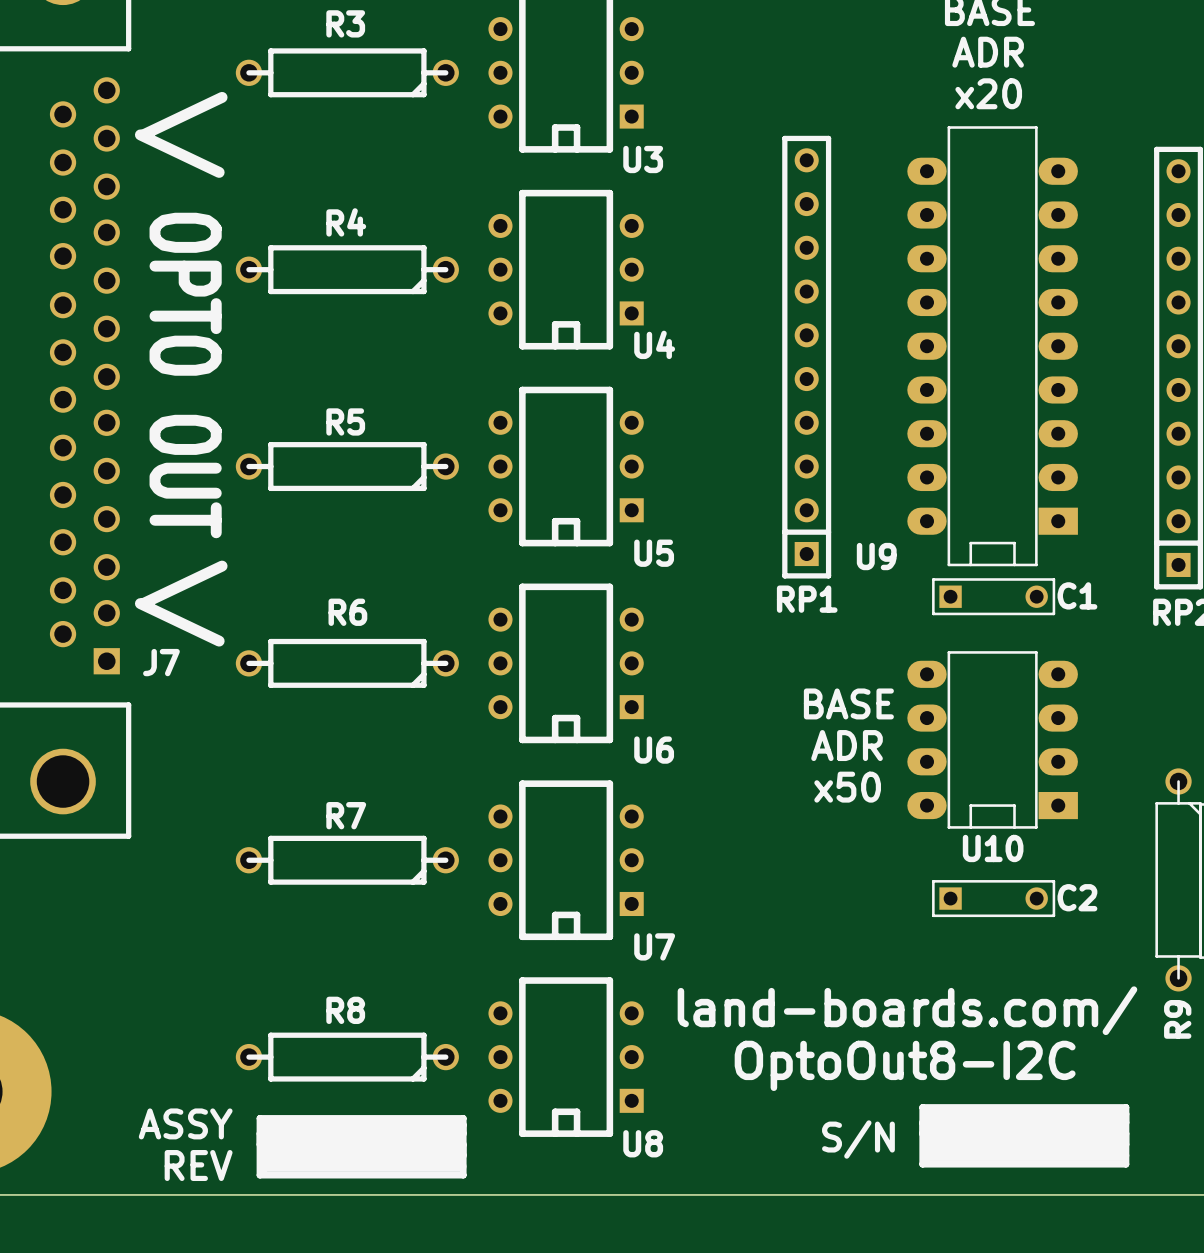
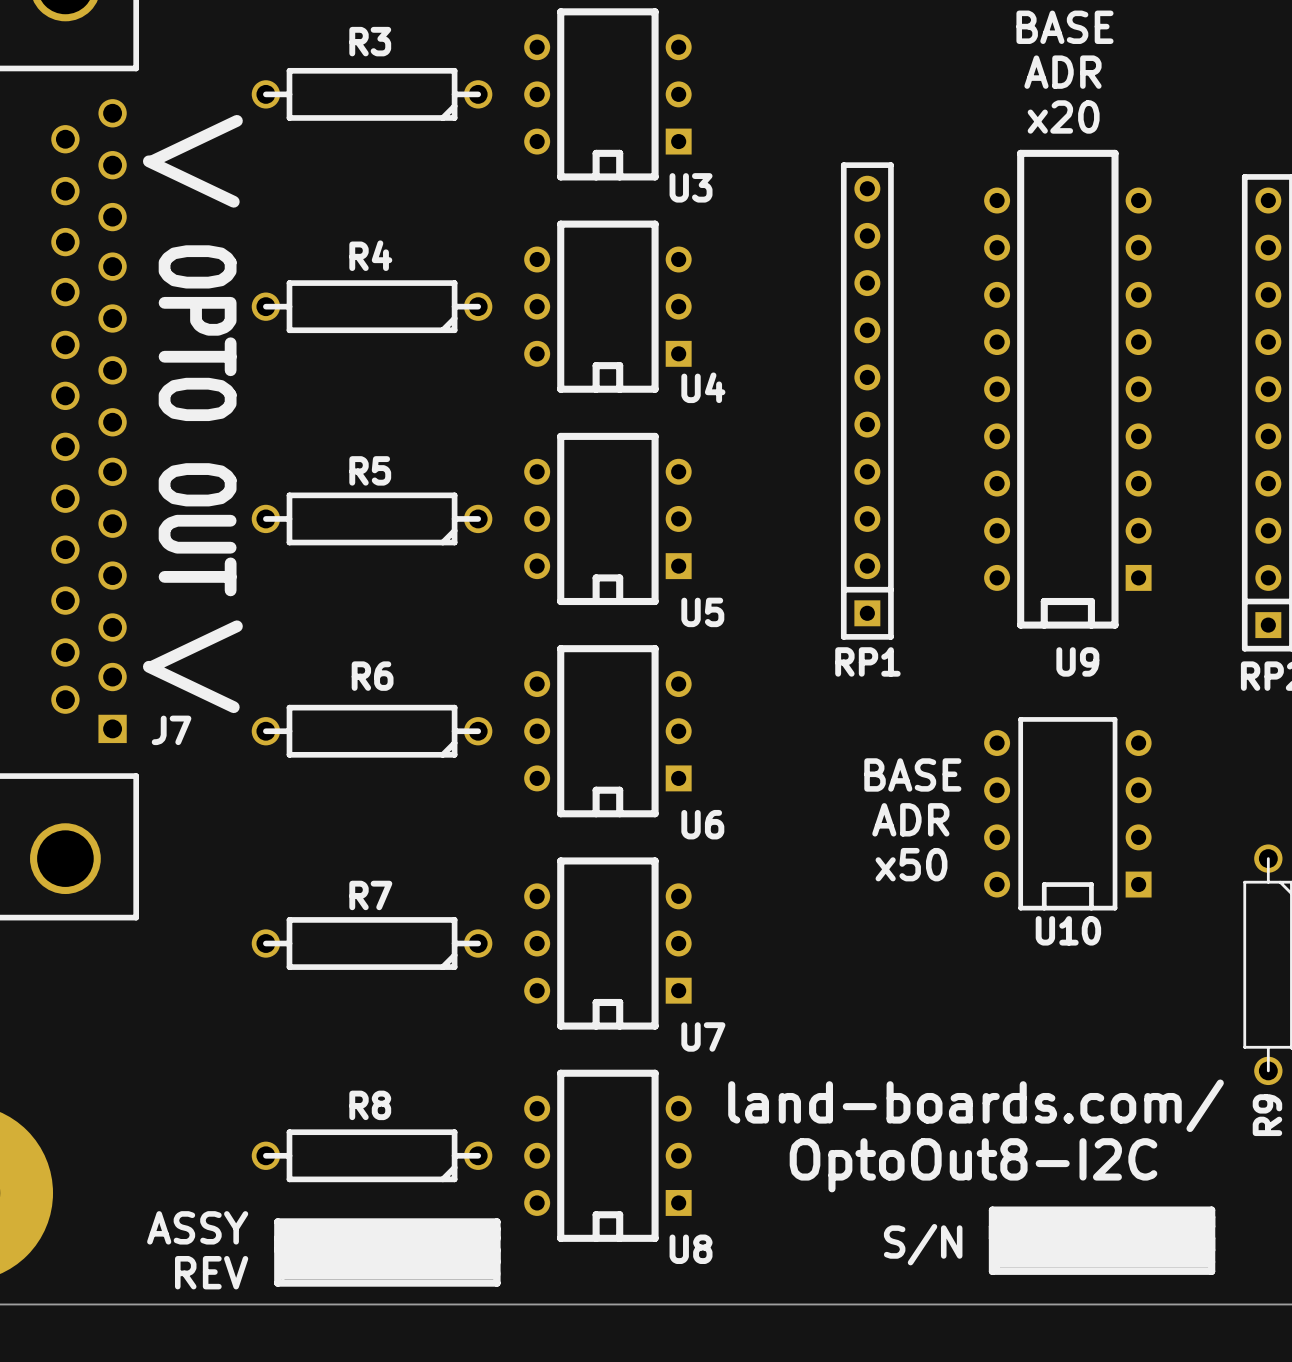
U9 footprint: [907, 126, 1078, 567] -> [984, 149, 1152, 629]
U9 name position: U9 (876, 556) -> U9 (1077, 661)
C1: (993, 596) -> none
U10 footprint: [907, 651, 1078, 829] -> [984, 717, 1152, 911]
C2: (993, 898) -> none

